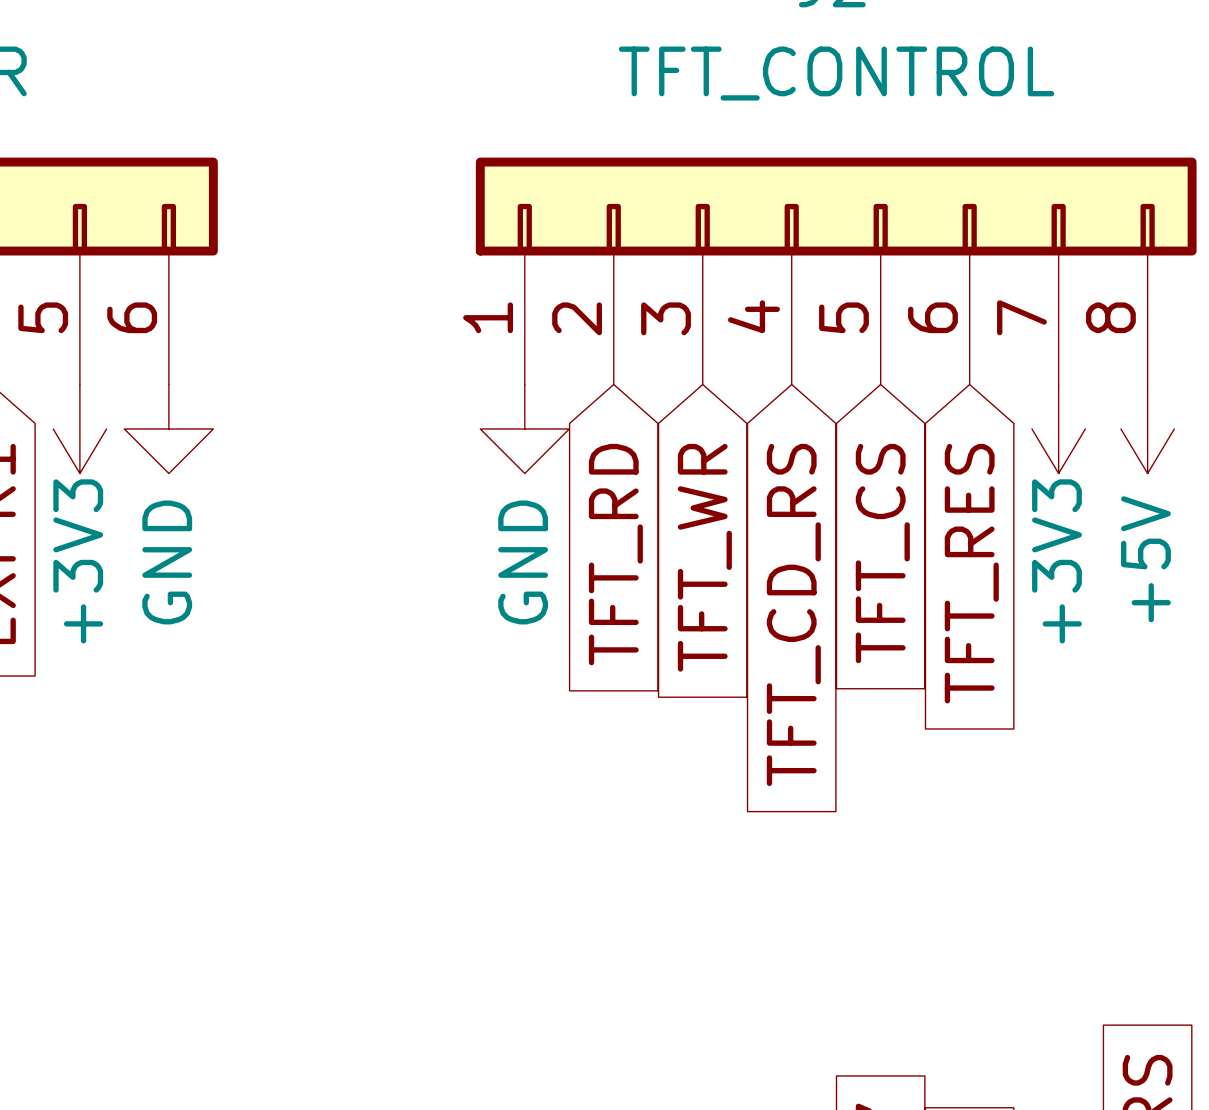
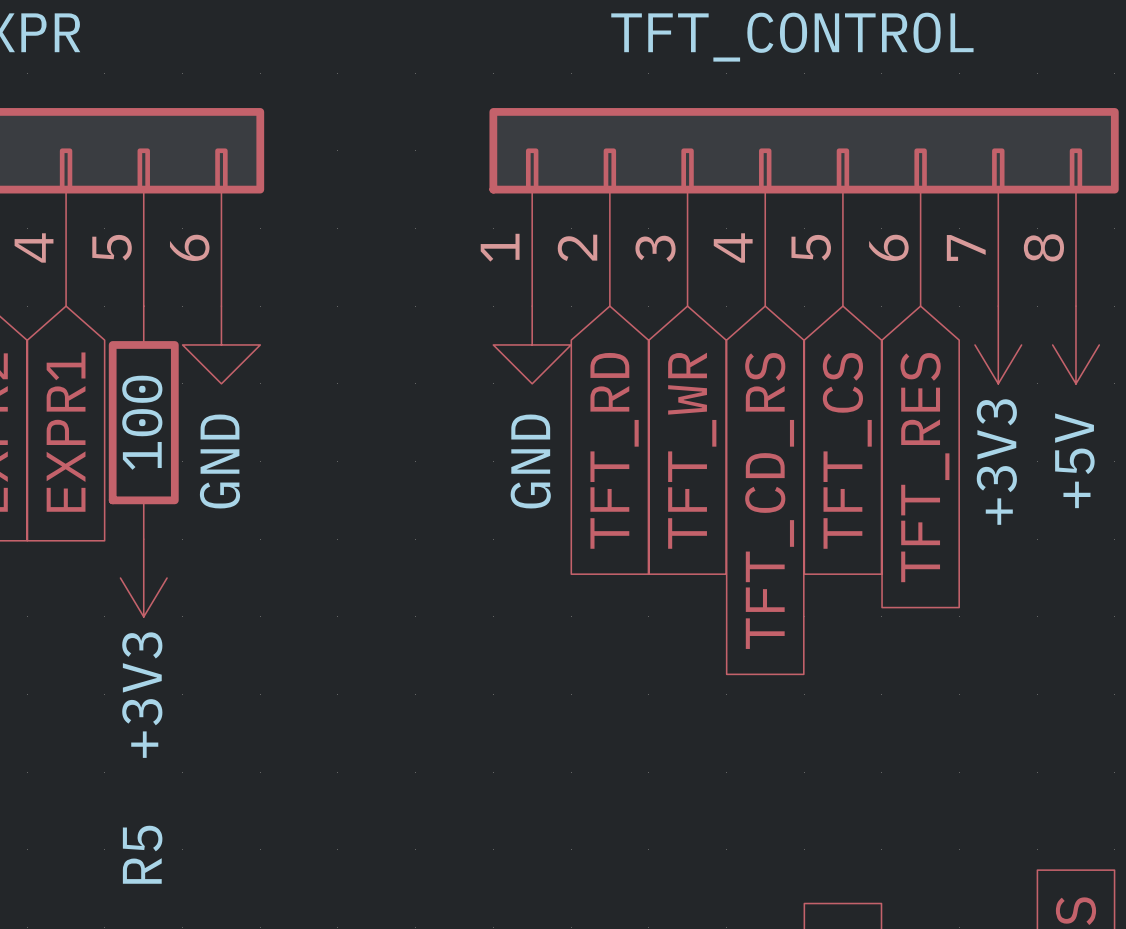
power symbol position: +3V3 (79, 428) -> +3V3 (143, 578)
R5: none -> 100 (143, 422)

